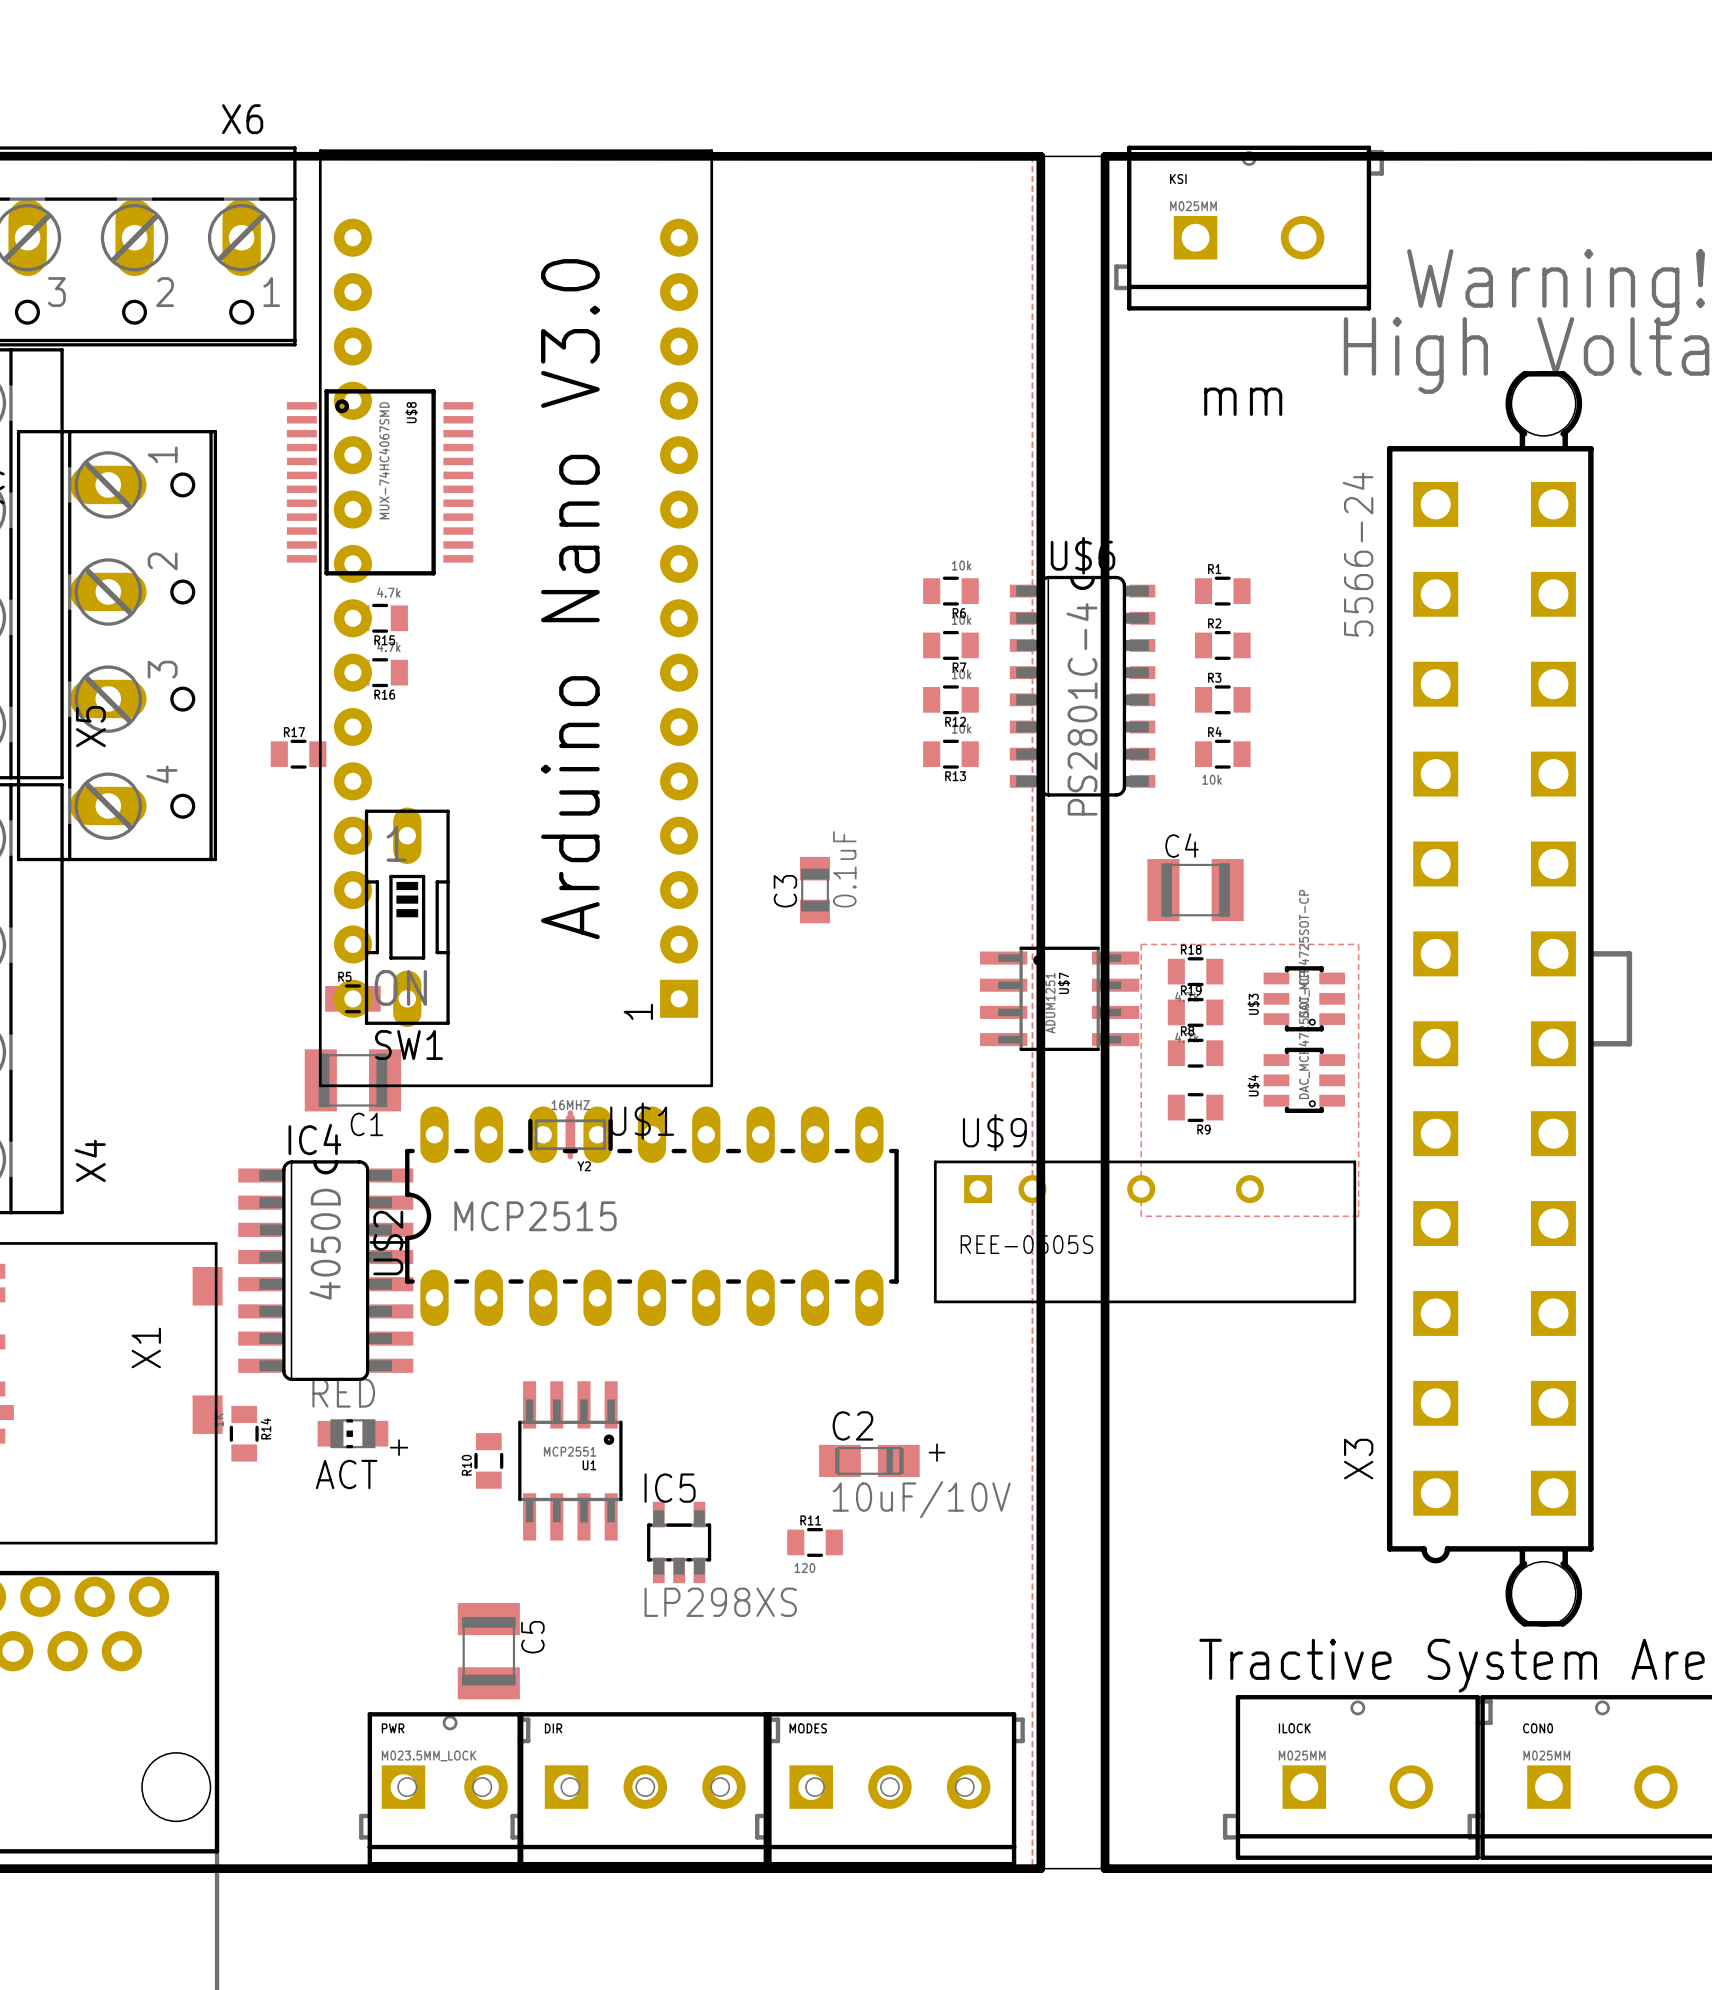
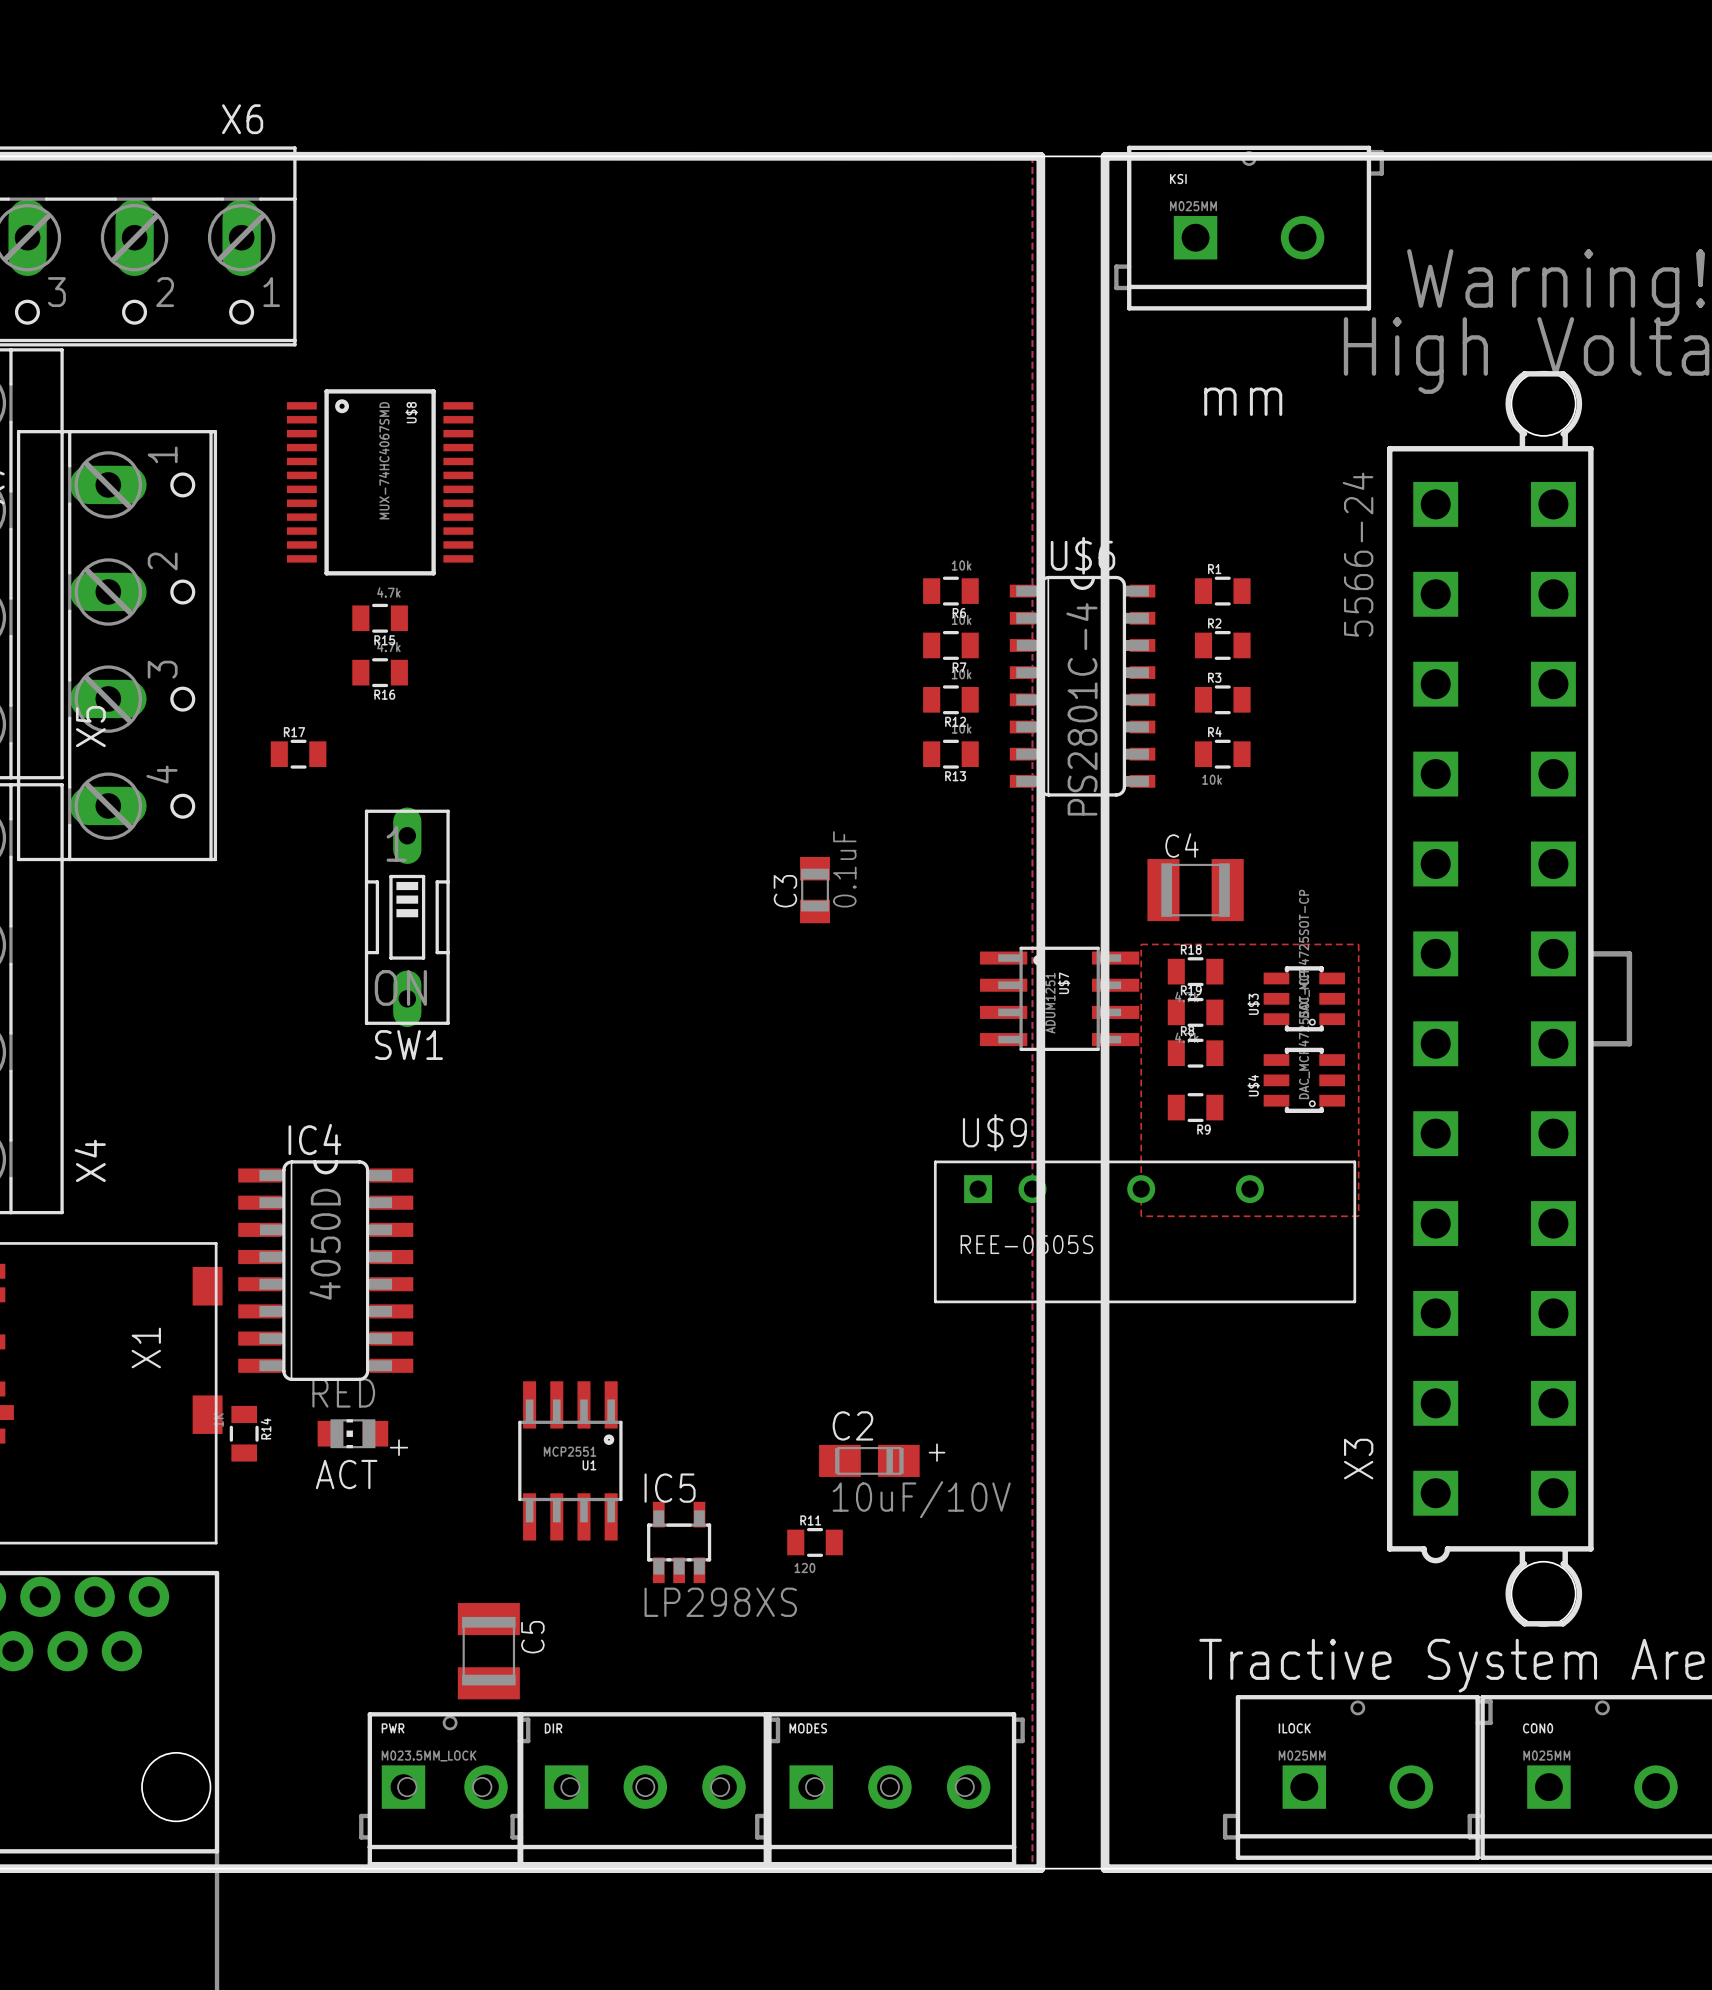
U$1: (516, 618) -> none
R5: (352, 998) -> none
C1: (352, 1080) -> none
Y2: 16MHZ (570, 1134) -> none
U$2: MCP2515 (651, 1216) -> none
R10: (488, 1460) -> none

